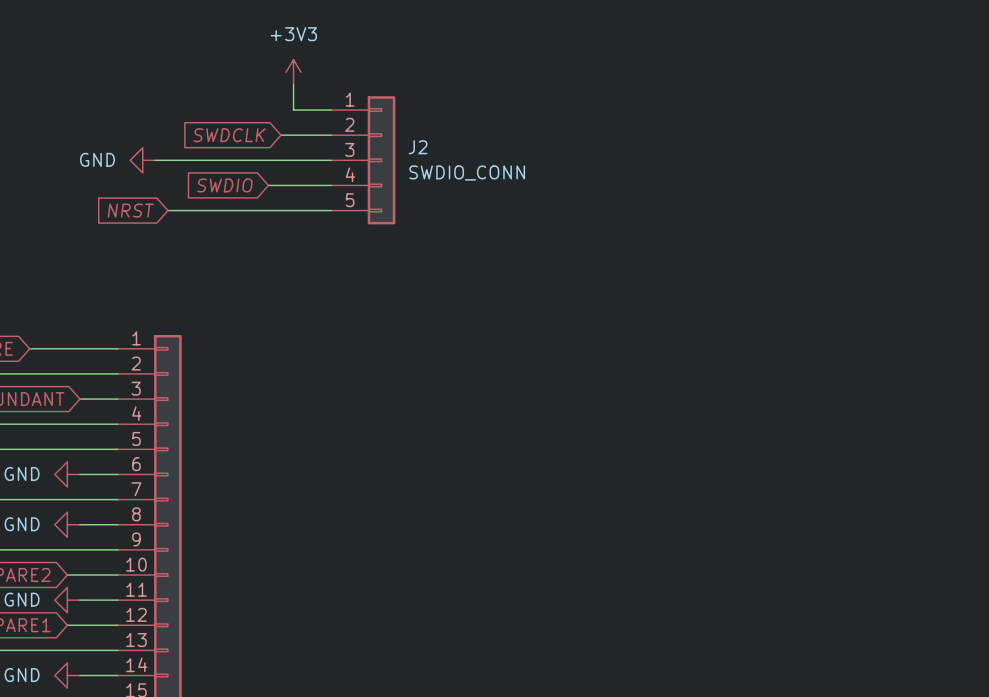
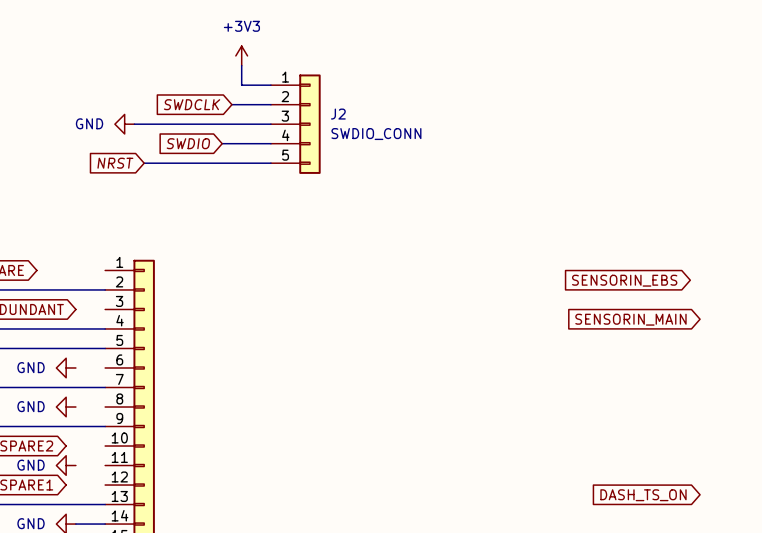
wire: (29, 348) (117, 348) -> none
global label: none -> SENSORIN_EBS (624, 280)
wire: (79, 399) (117, 399) -> none
global label: none -> SENSORIN_MAIN (630, 319)
wire: (79, 474) (117, 474) -> none
wire: (79, 524) (117, 524) -> none
wire: (67, 574) (117, 574) -> none
wire: (79, 600) (117, 600) -> none
wire: (67, 625) (117, 625) -> none
global label: none -> DASH_TS_ON (643, 495)

